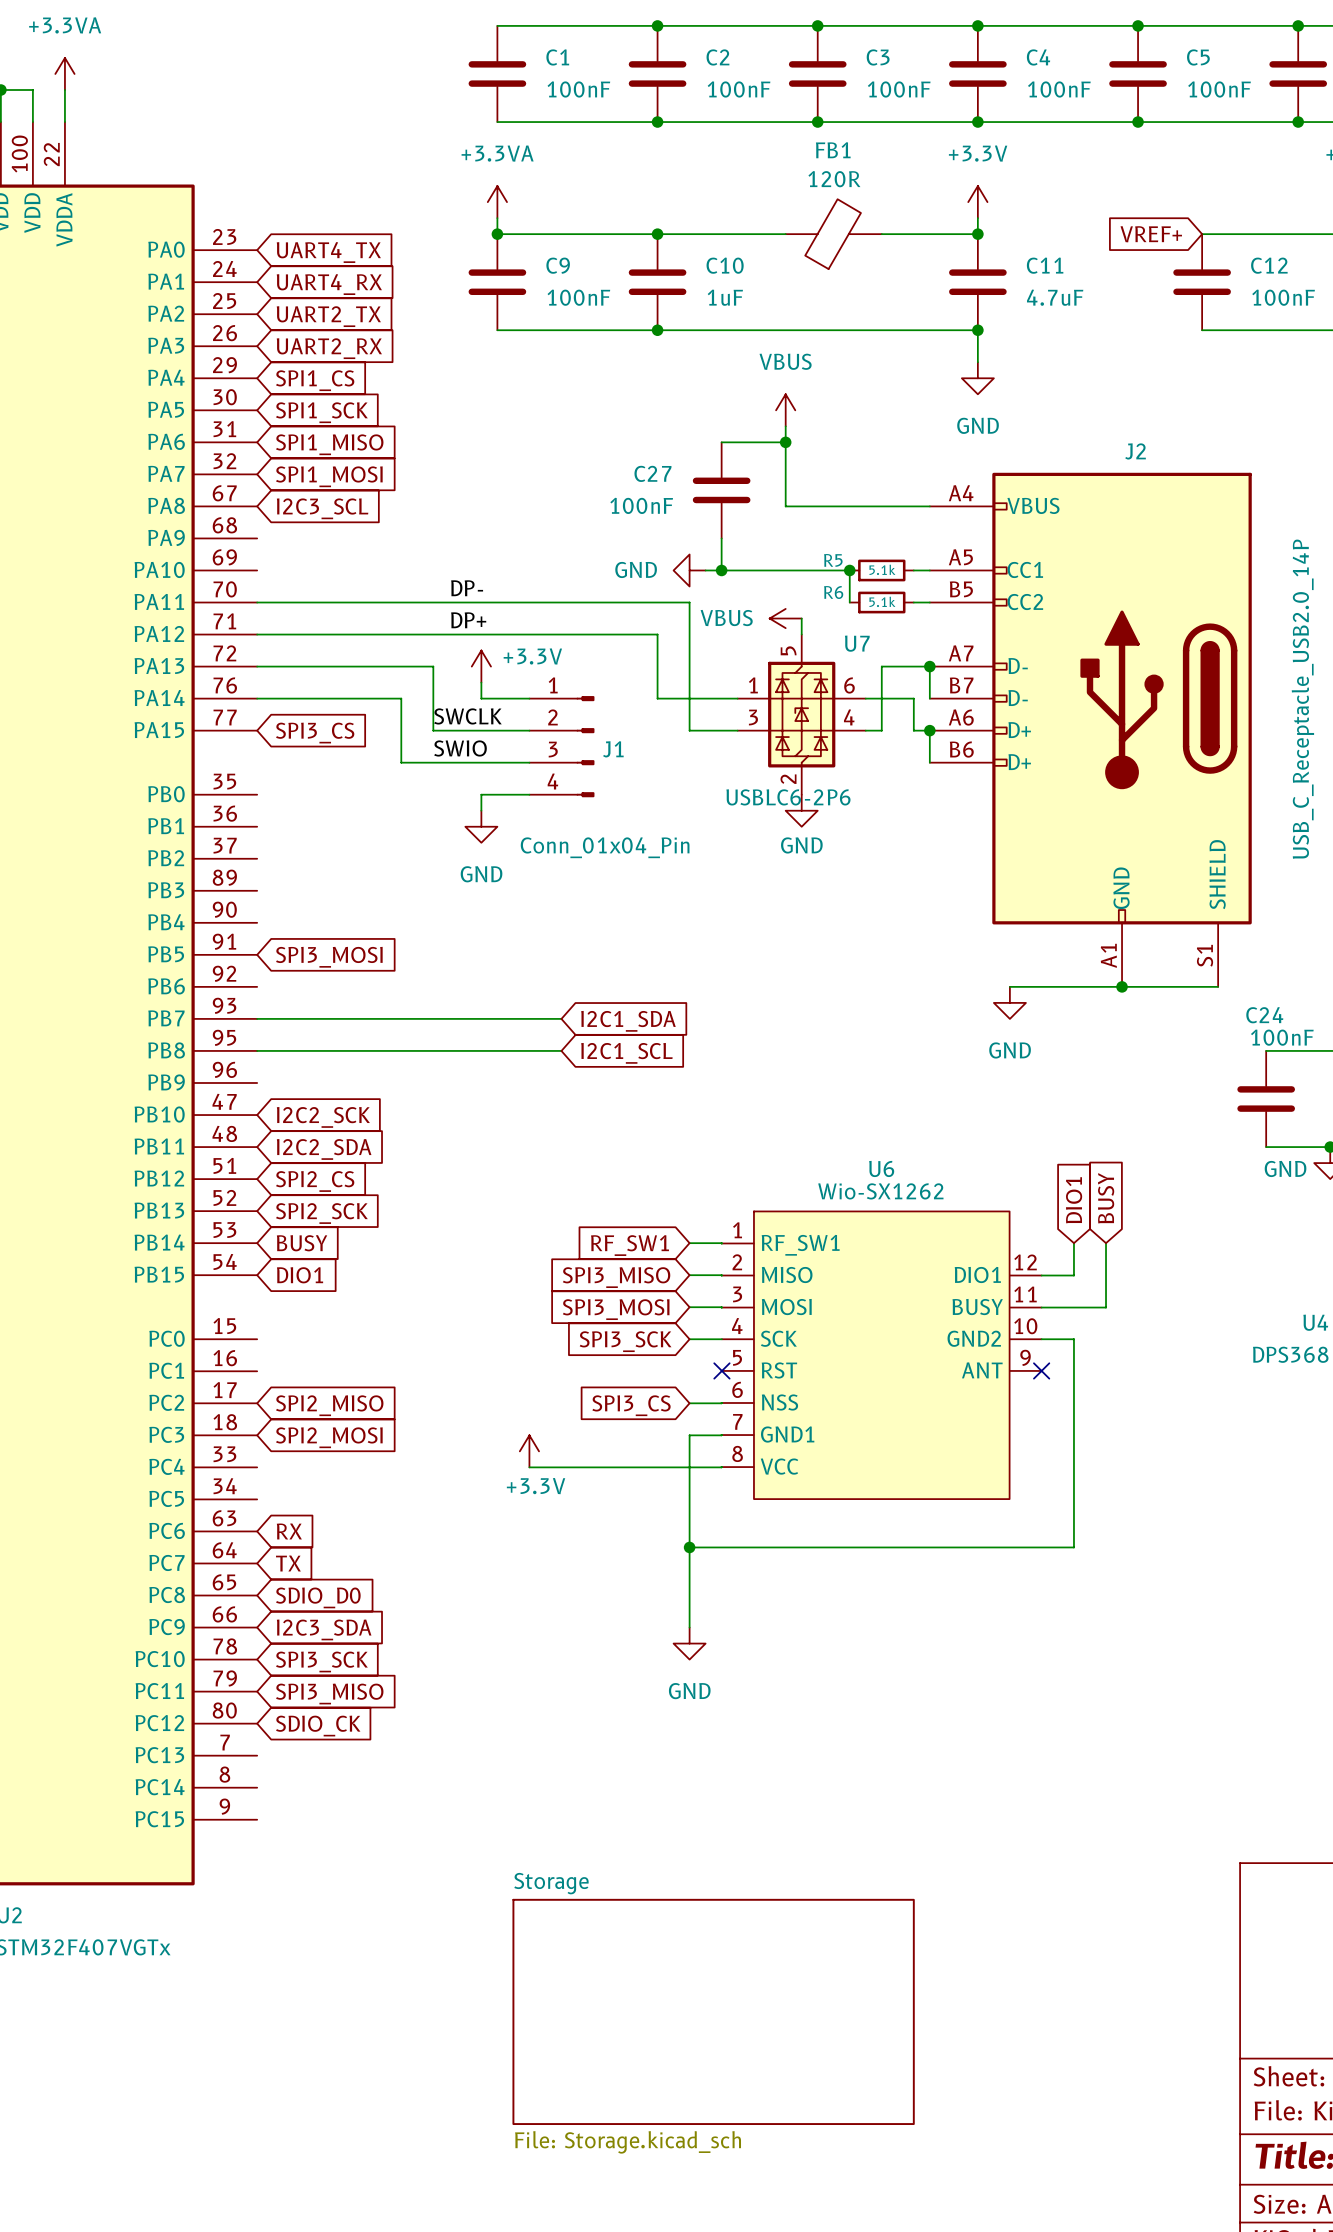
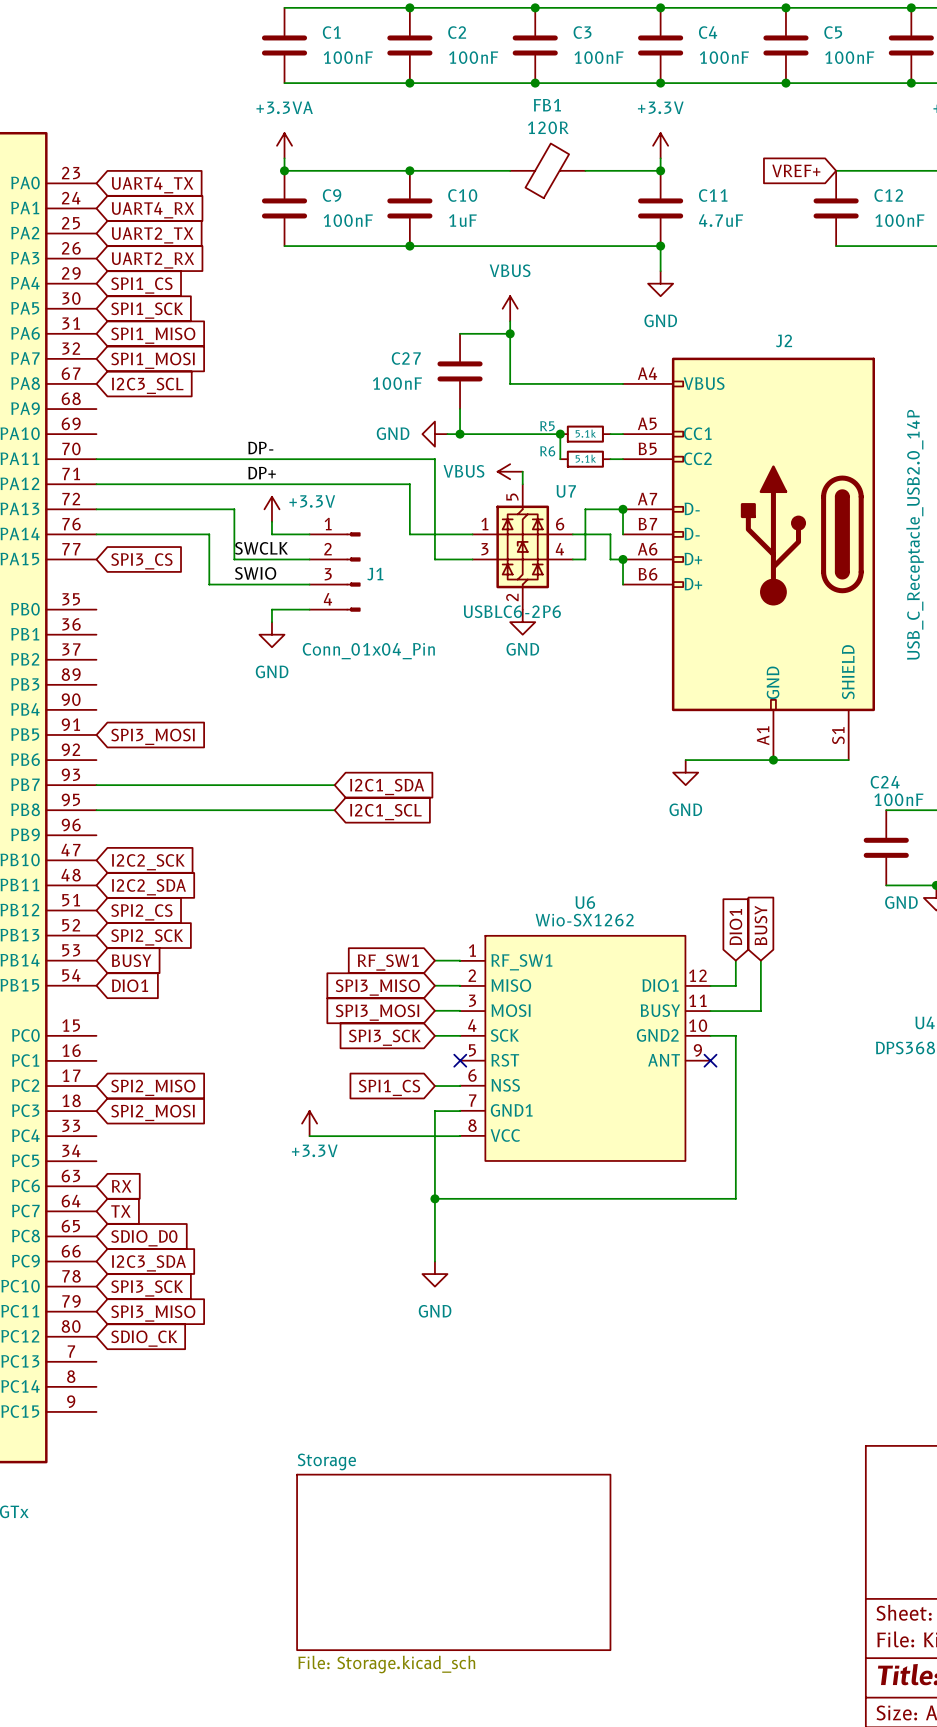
global label: SPI3_CS (631, 1405) -> SPI1_CS (389, 1087)

